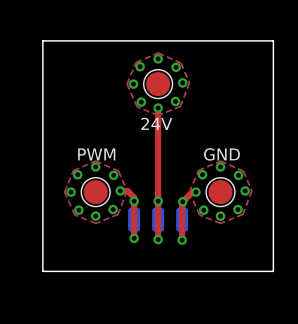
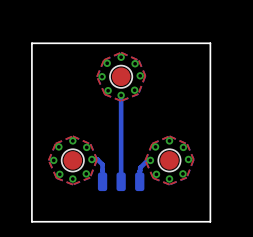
top track: (158, 108) (158, 239) -> none
text: 24V (156, 123) -> none
text: PWM (96, 154) -> none
text: GND (222, 154) -> none
top track: (120, 190) (127, 190) (134, 197) (134, 238) -> none
top track: (195, 192) (192, 192) (182, 202) (182, 240) -> none
via: (134, 201) -> none
via: (158, 201) -> none
via: (182, 201) -> none
via: (134, 238) -> none
via: (158, 239) -> none
via: (182, 240) -> none

